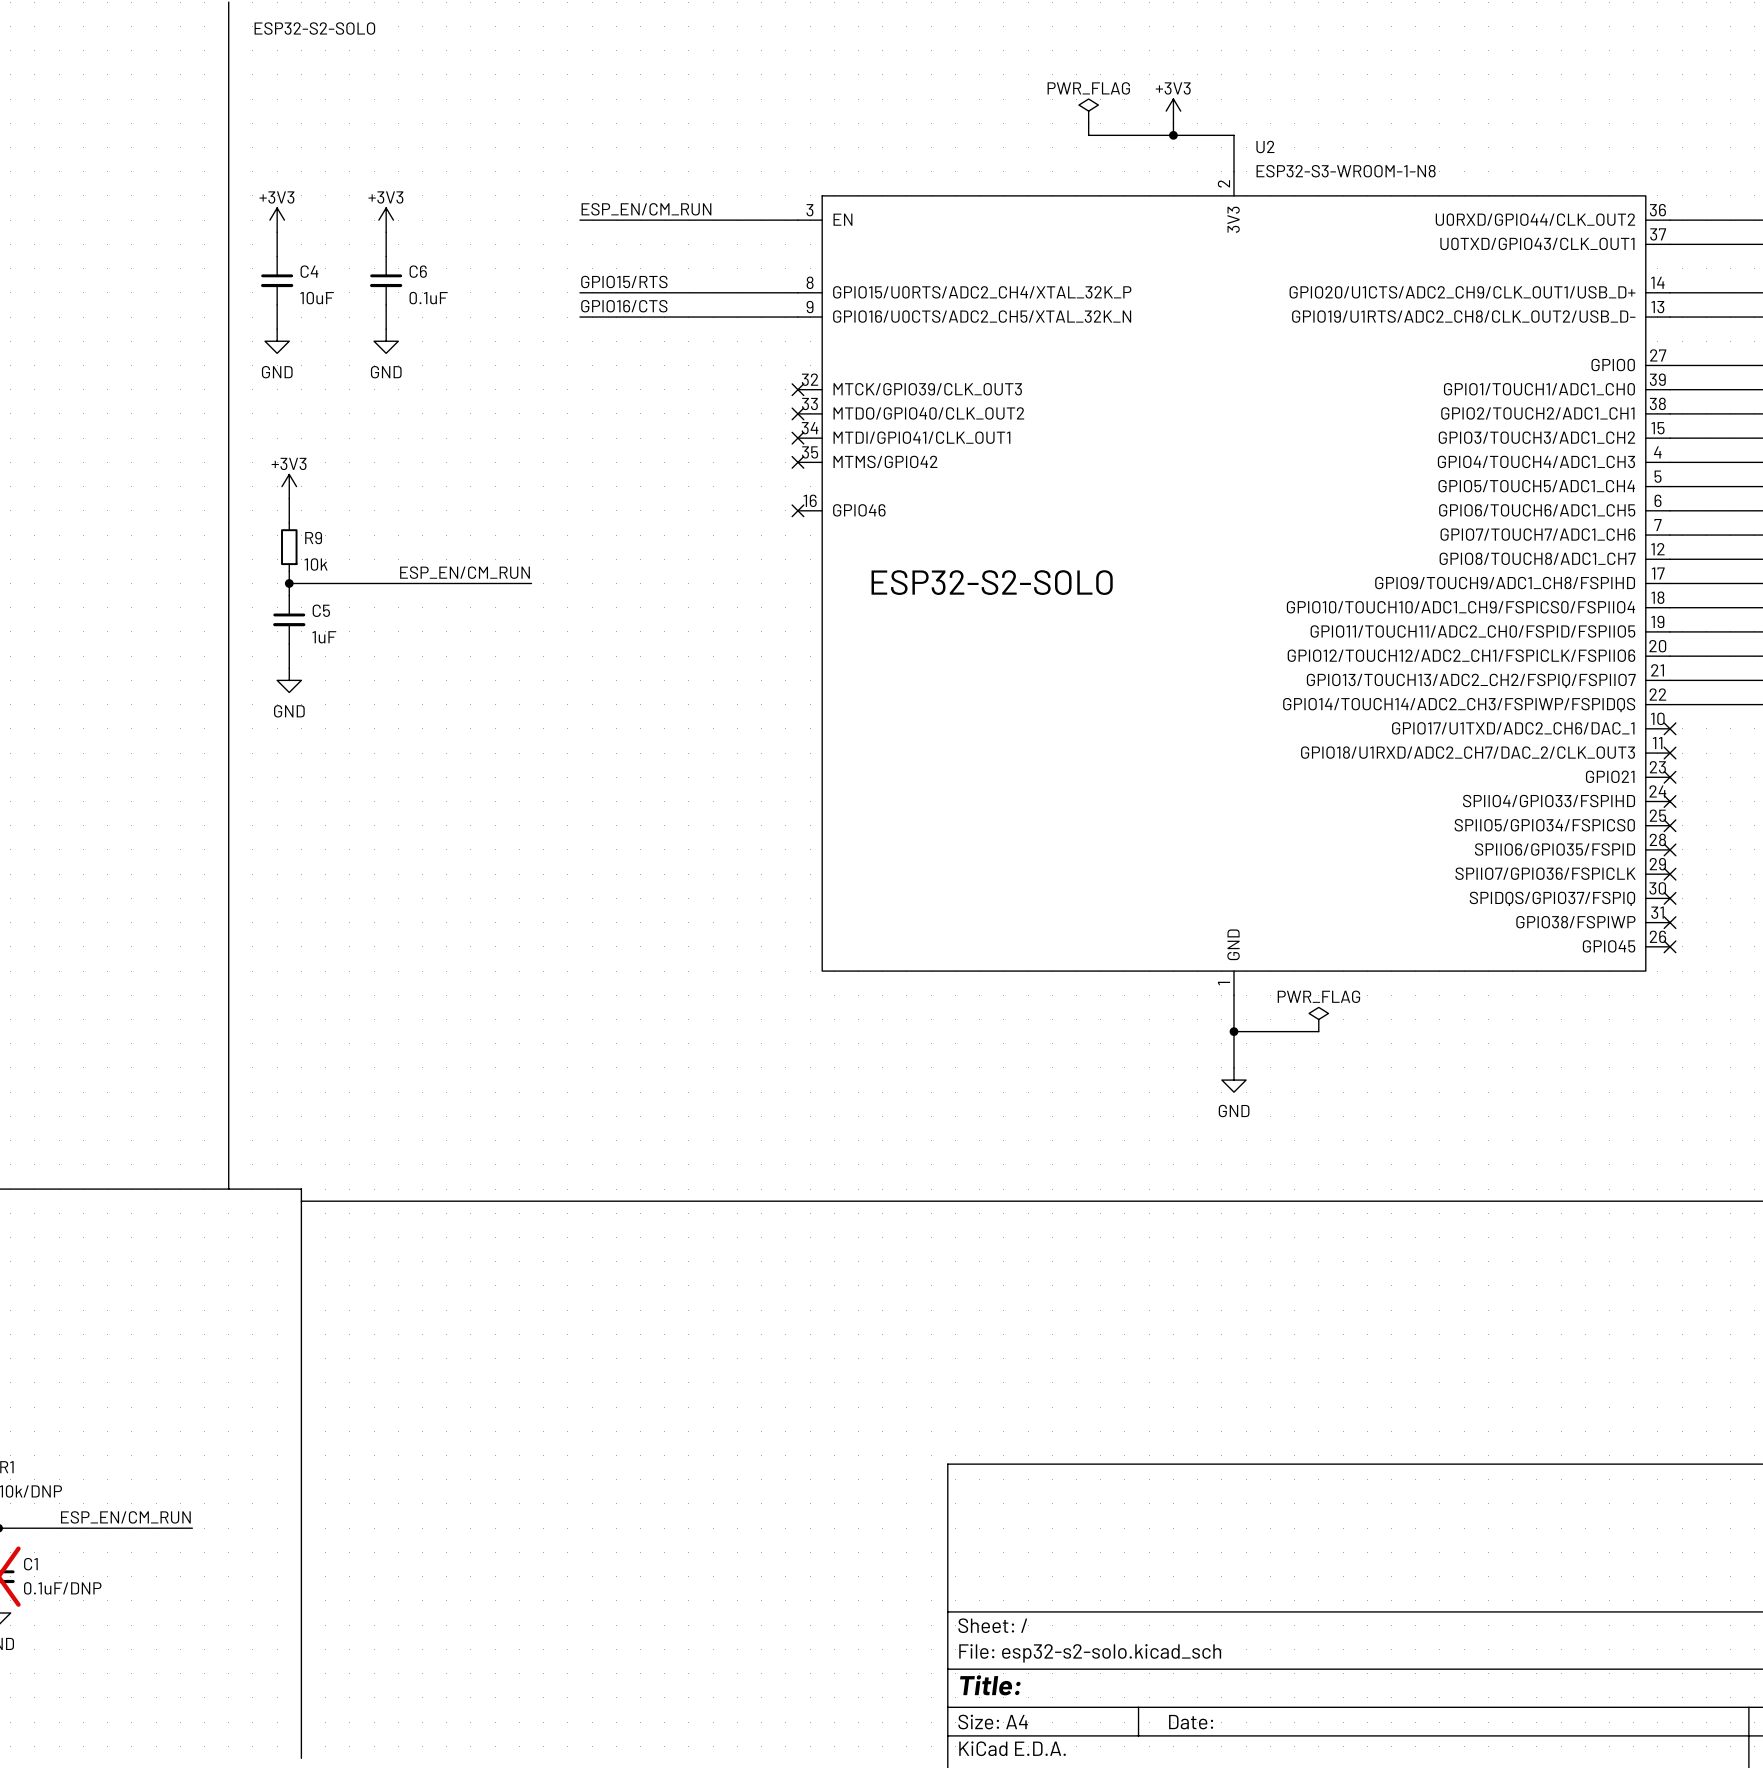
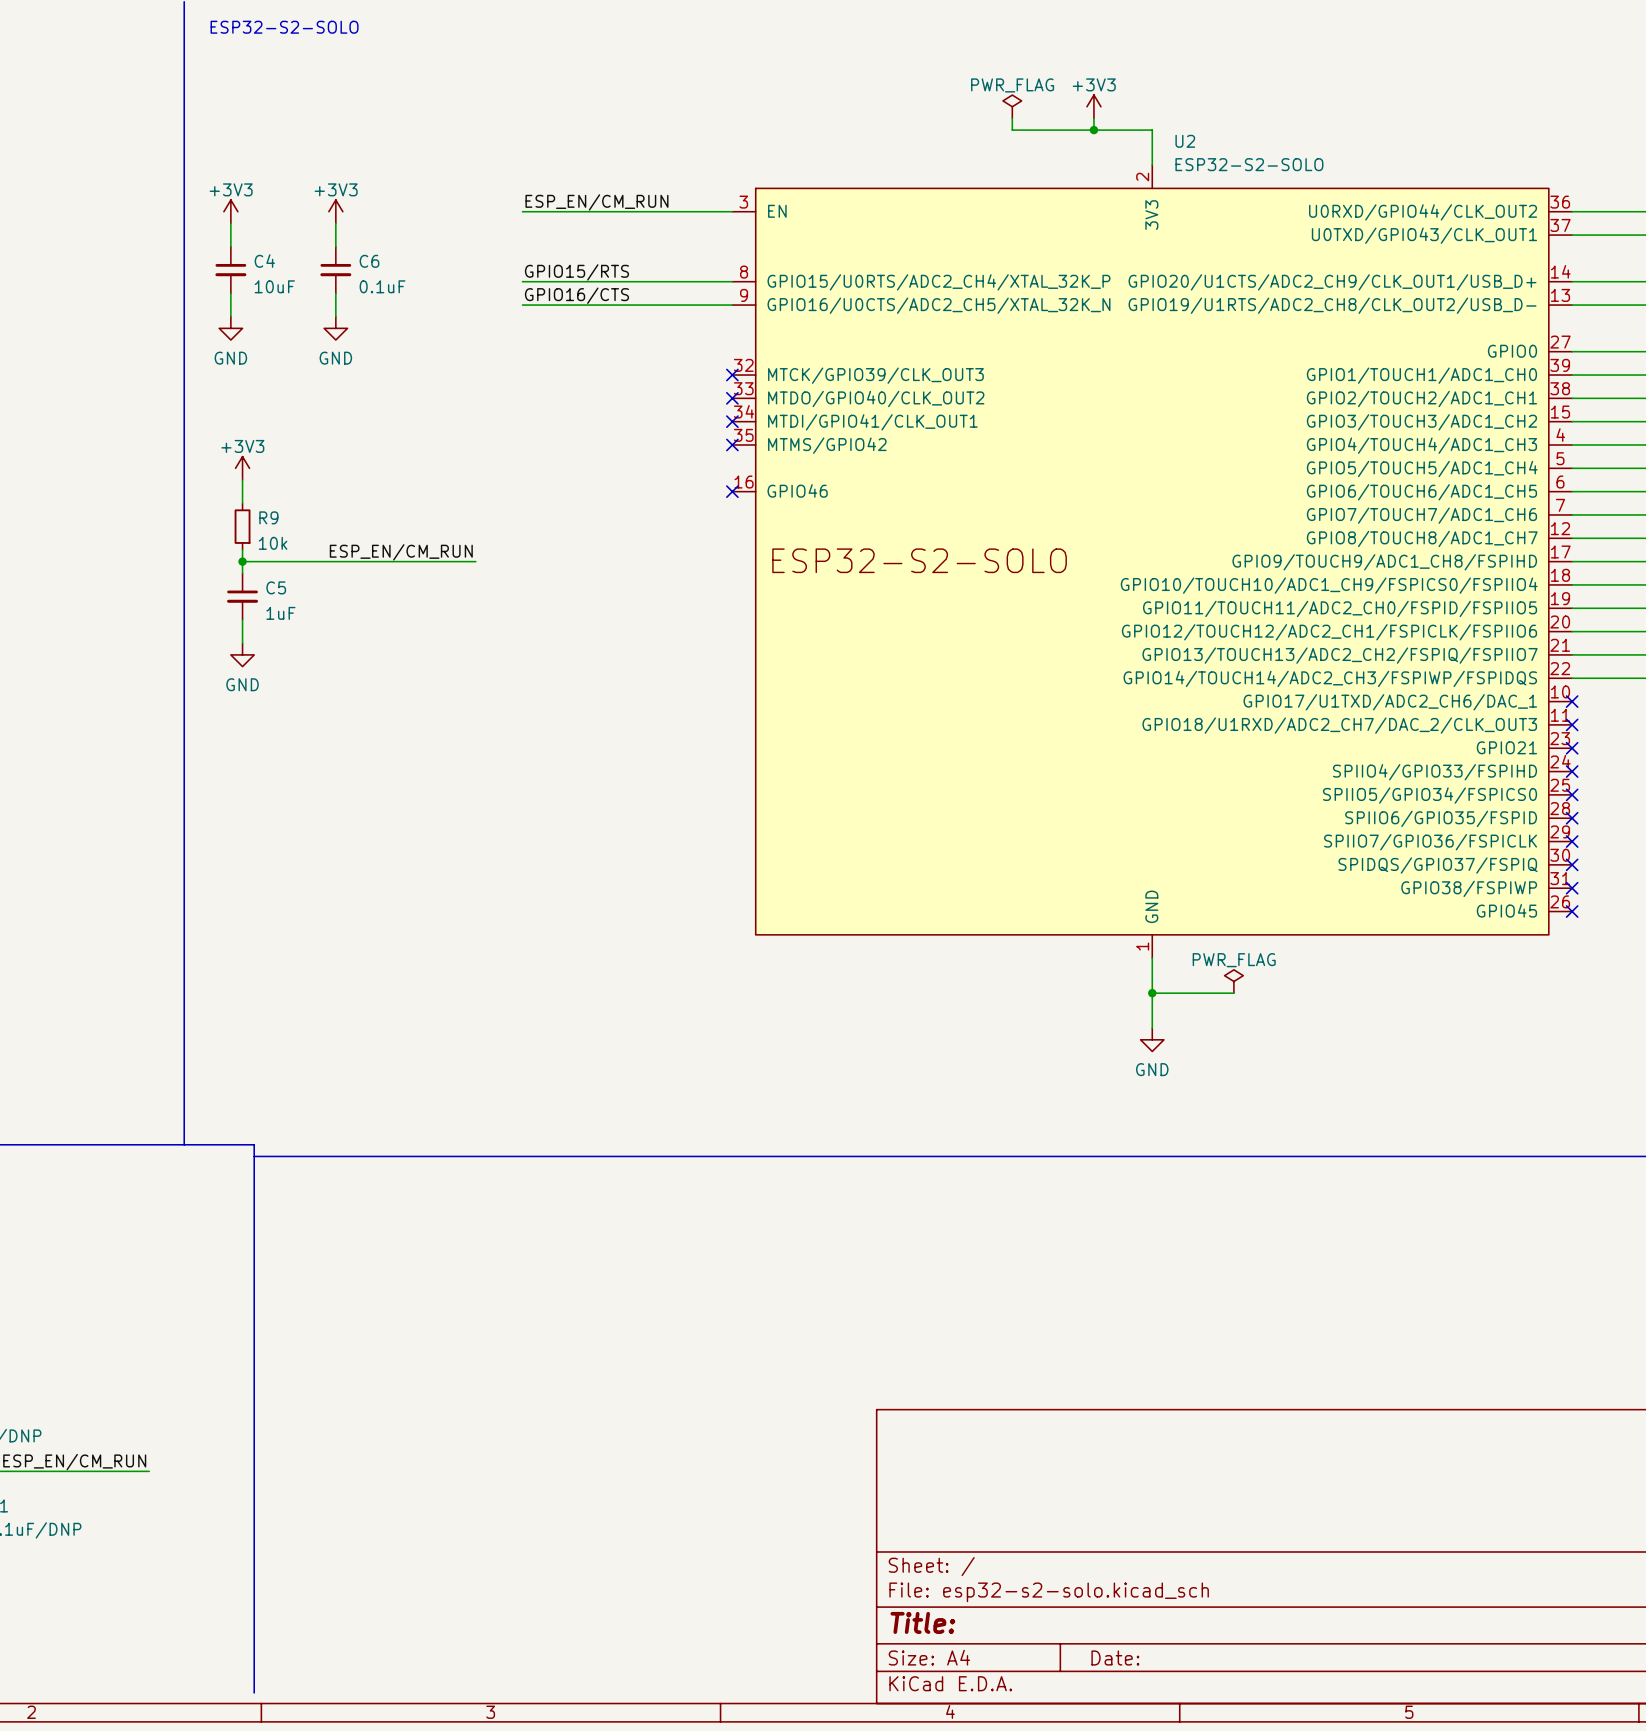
U2 value: ESP32-S3-WROOM-1-N8 (1346, 171) -> ESP32-S2-SOLO (1249, 164)

